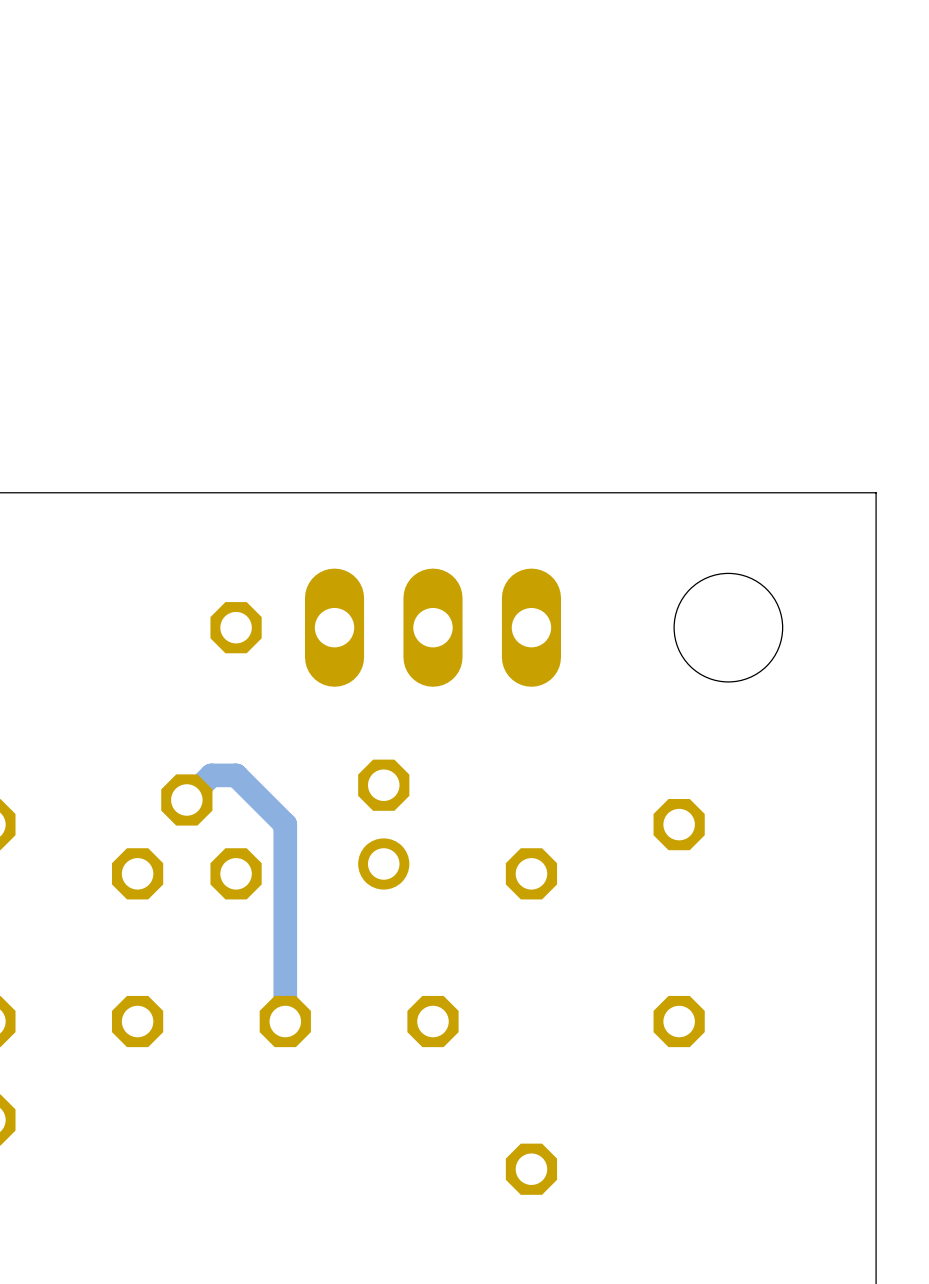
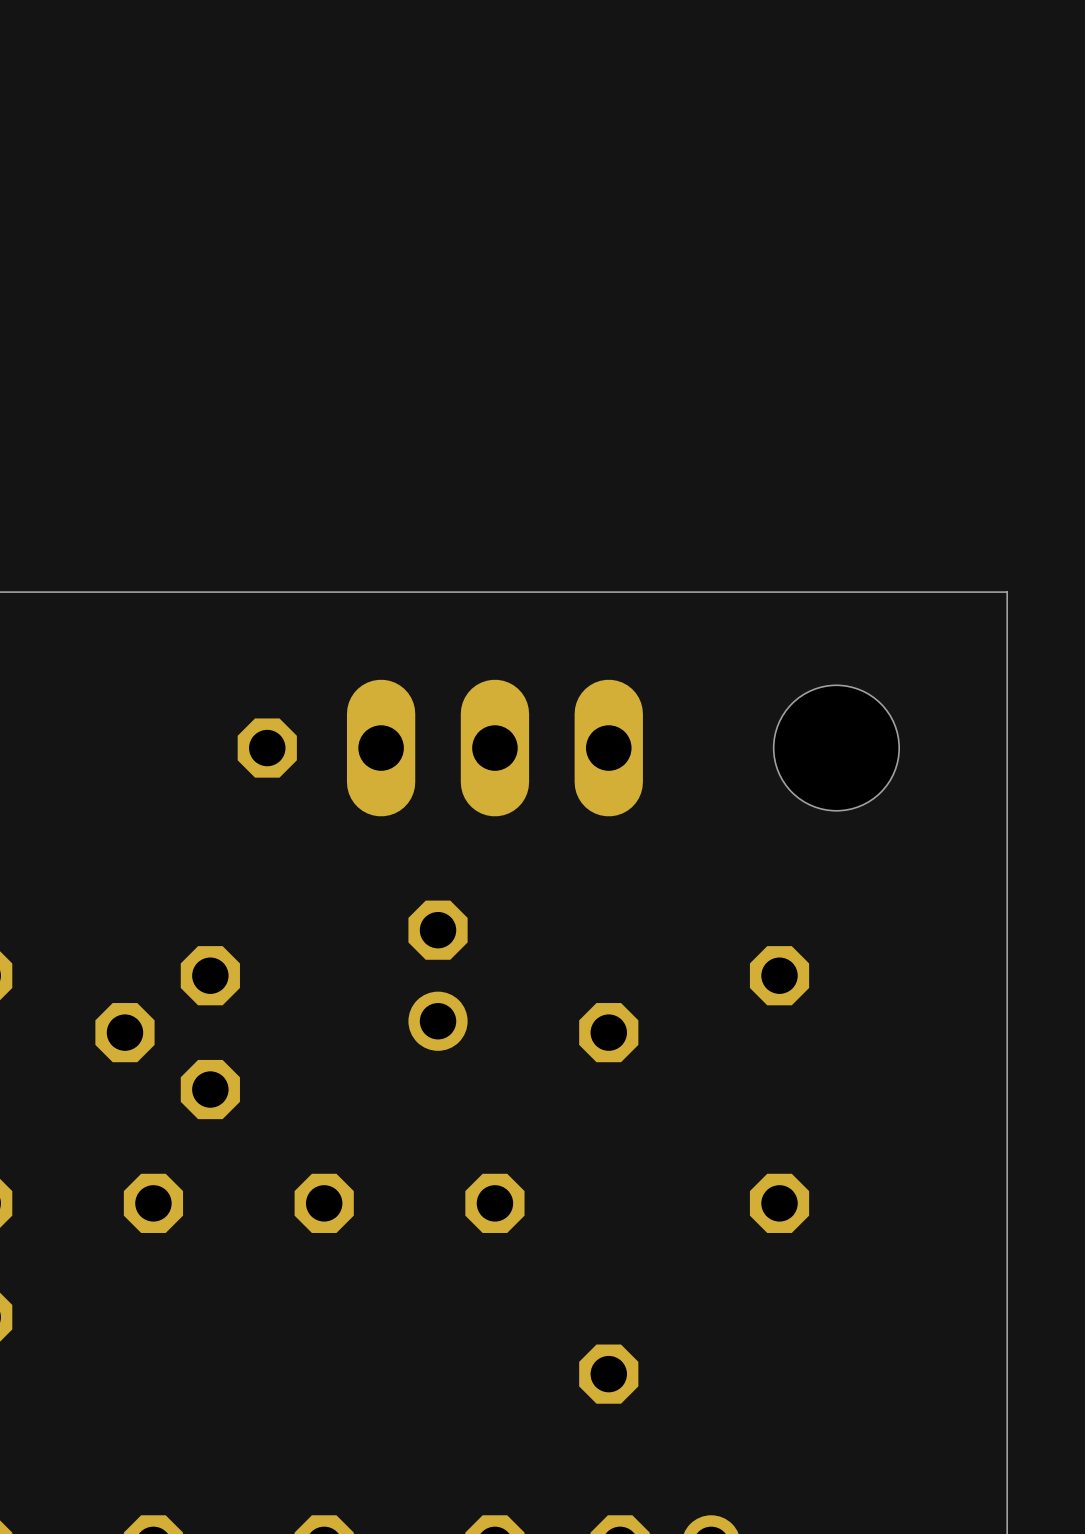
track: (186, 799) (211, 775) (236, 775) (285, 824) (285, 1021) -> none
part rotation: 0° (186, 836) -> 90° counterclockwise (167, 1032)

